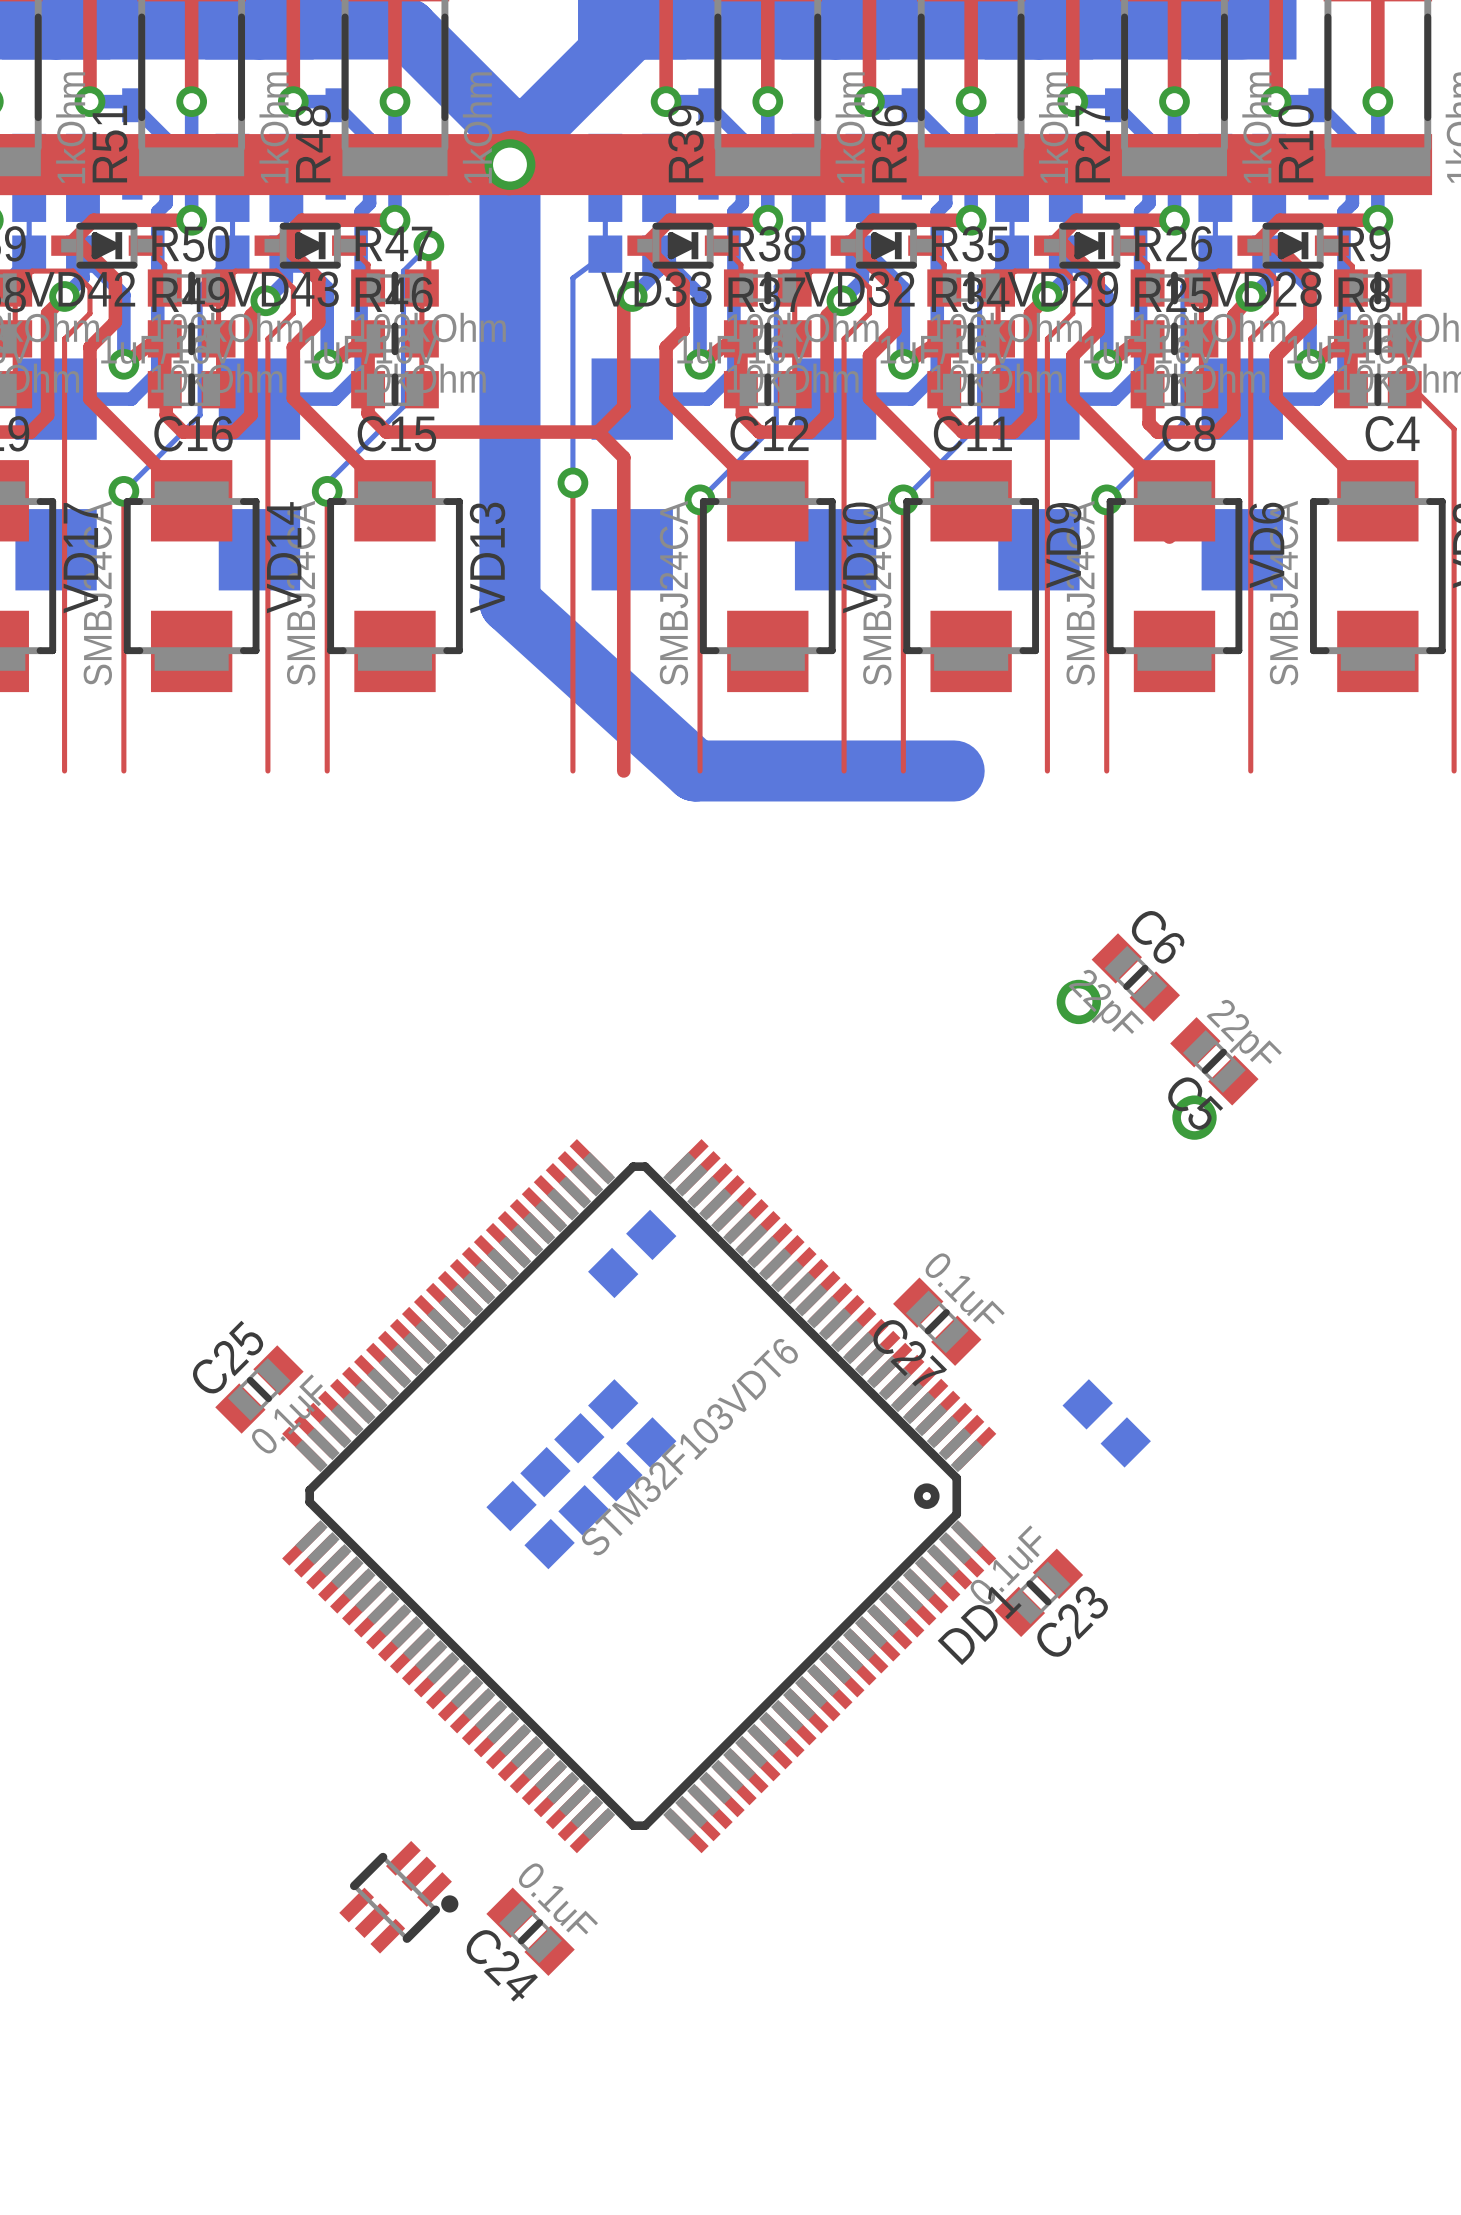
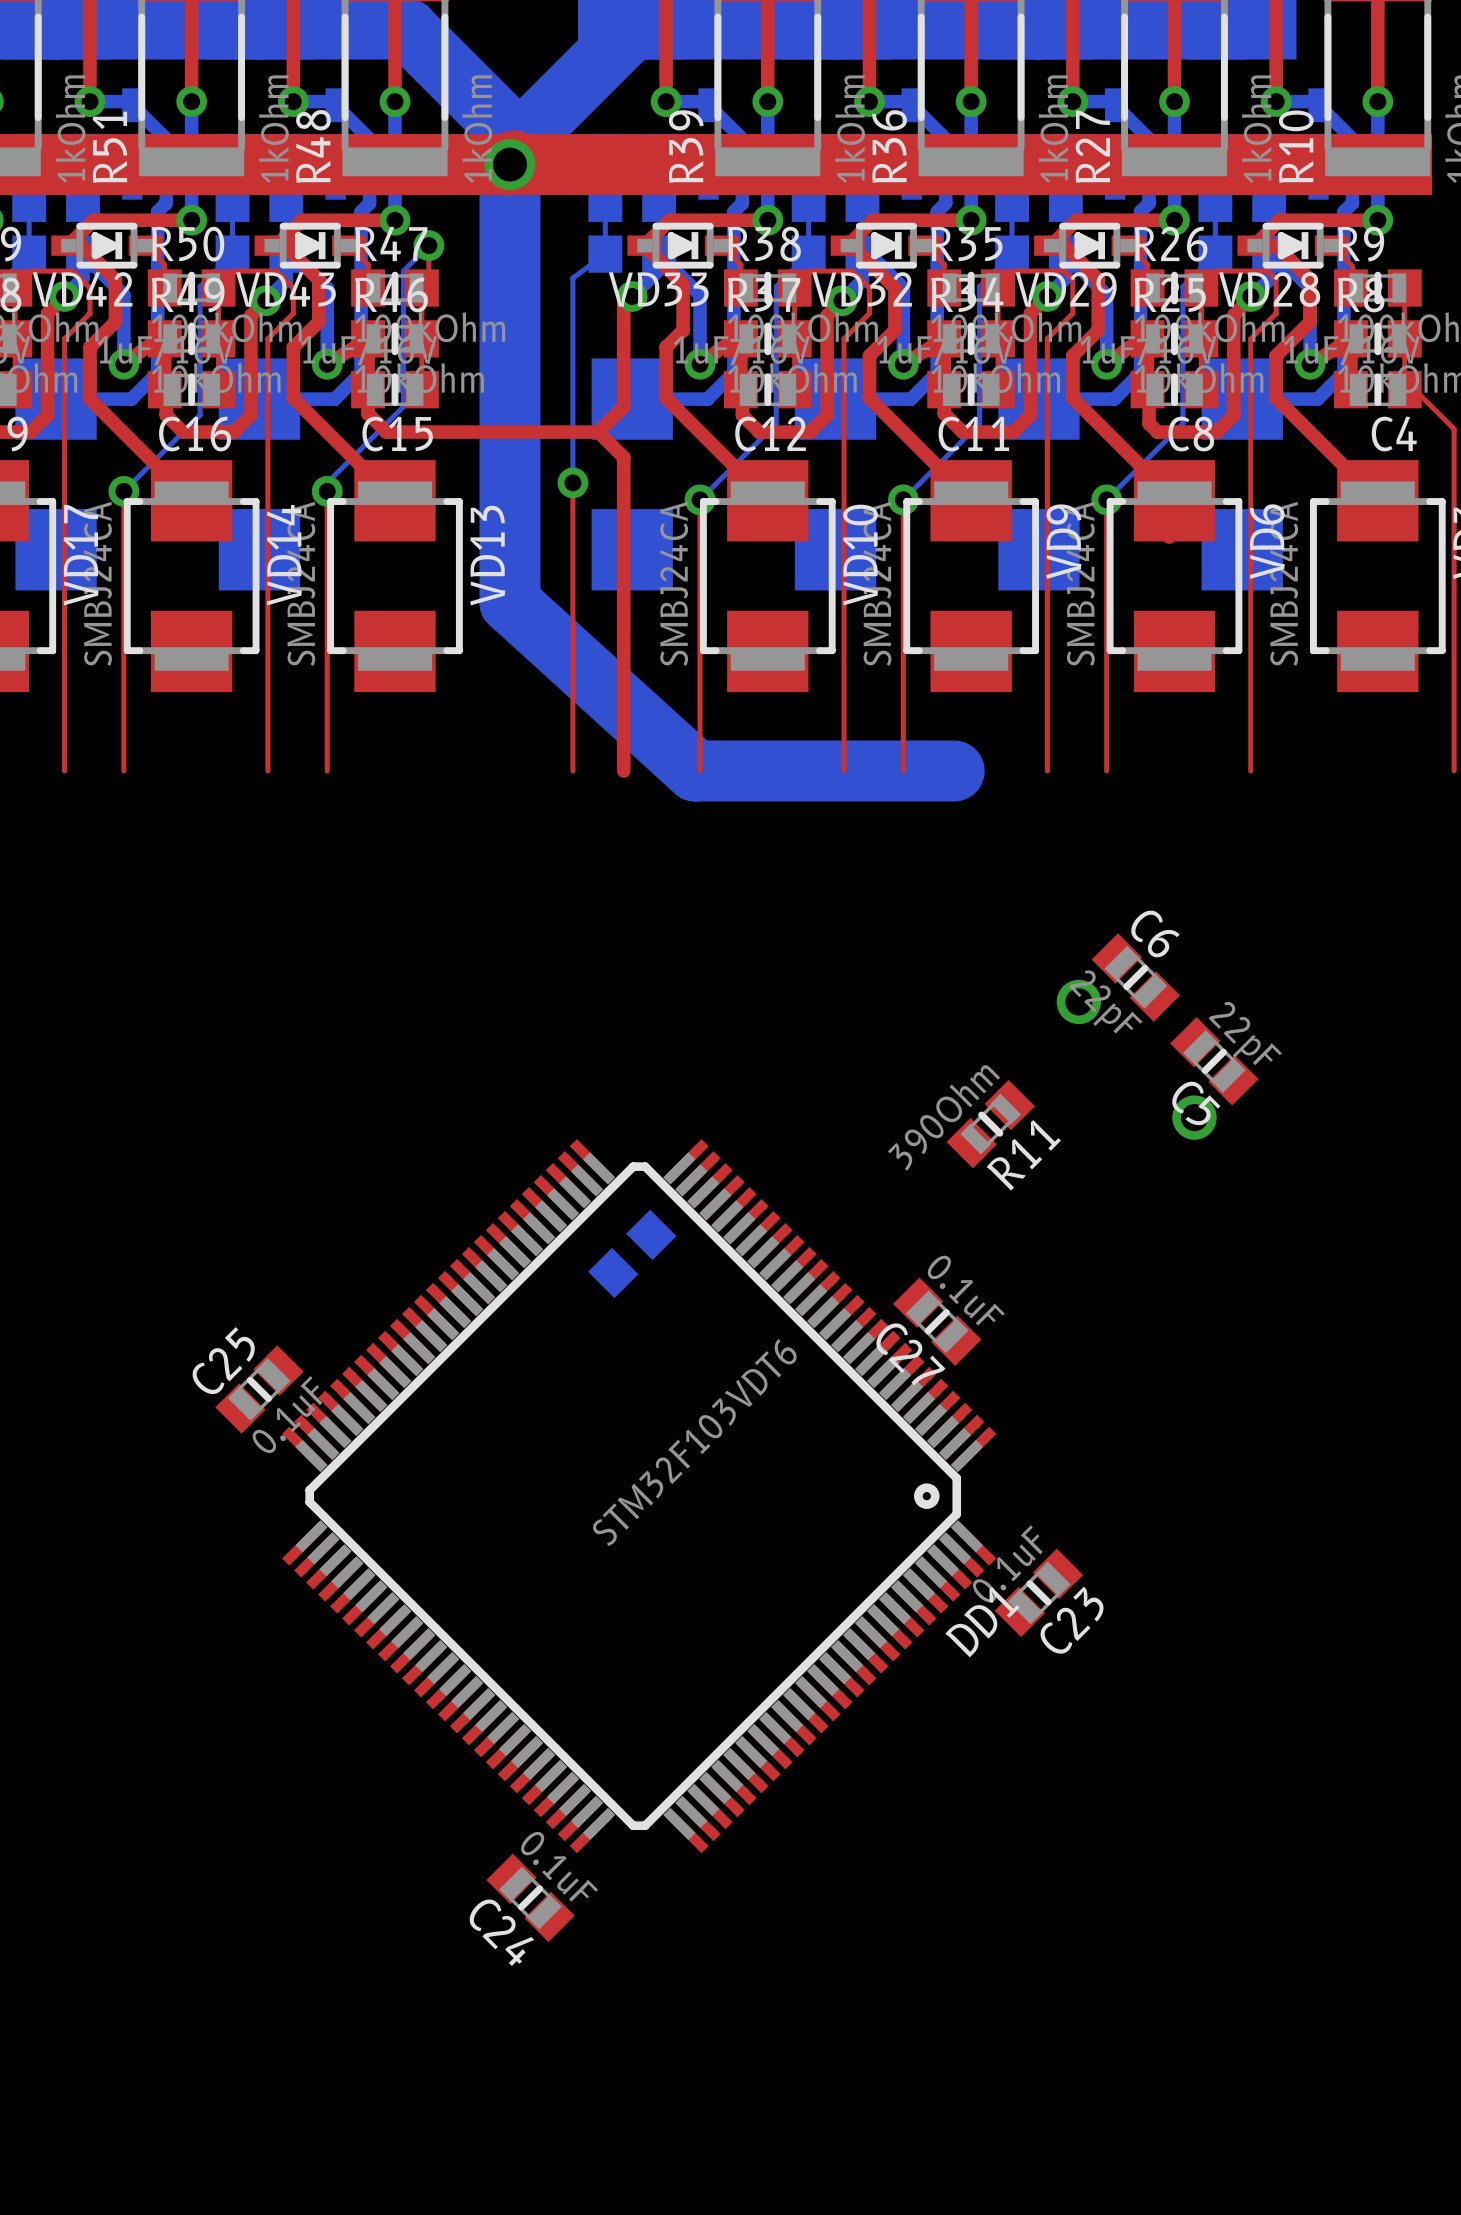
part: (632, 1423) -> none
part: (1106, 1423) -> none
part: (598, 1457) -> none
R11 side: bottom (564, 1491) -> top (990, 1124)
part: (530, 1525) -> none
part: (398, 1897) -> none
C24 position: (530, 1931) -> (530, 1897)

